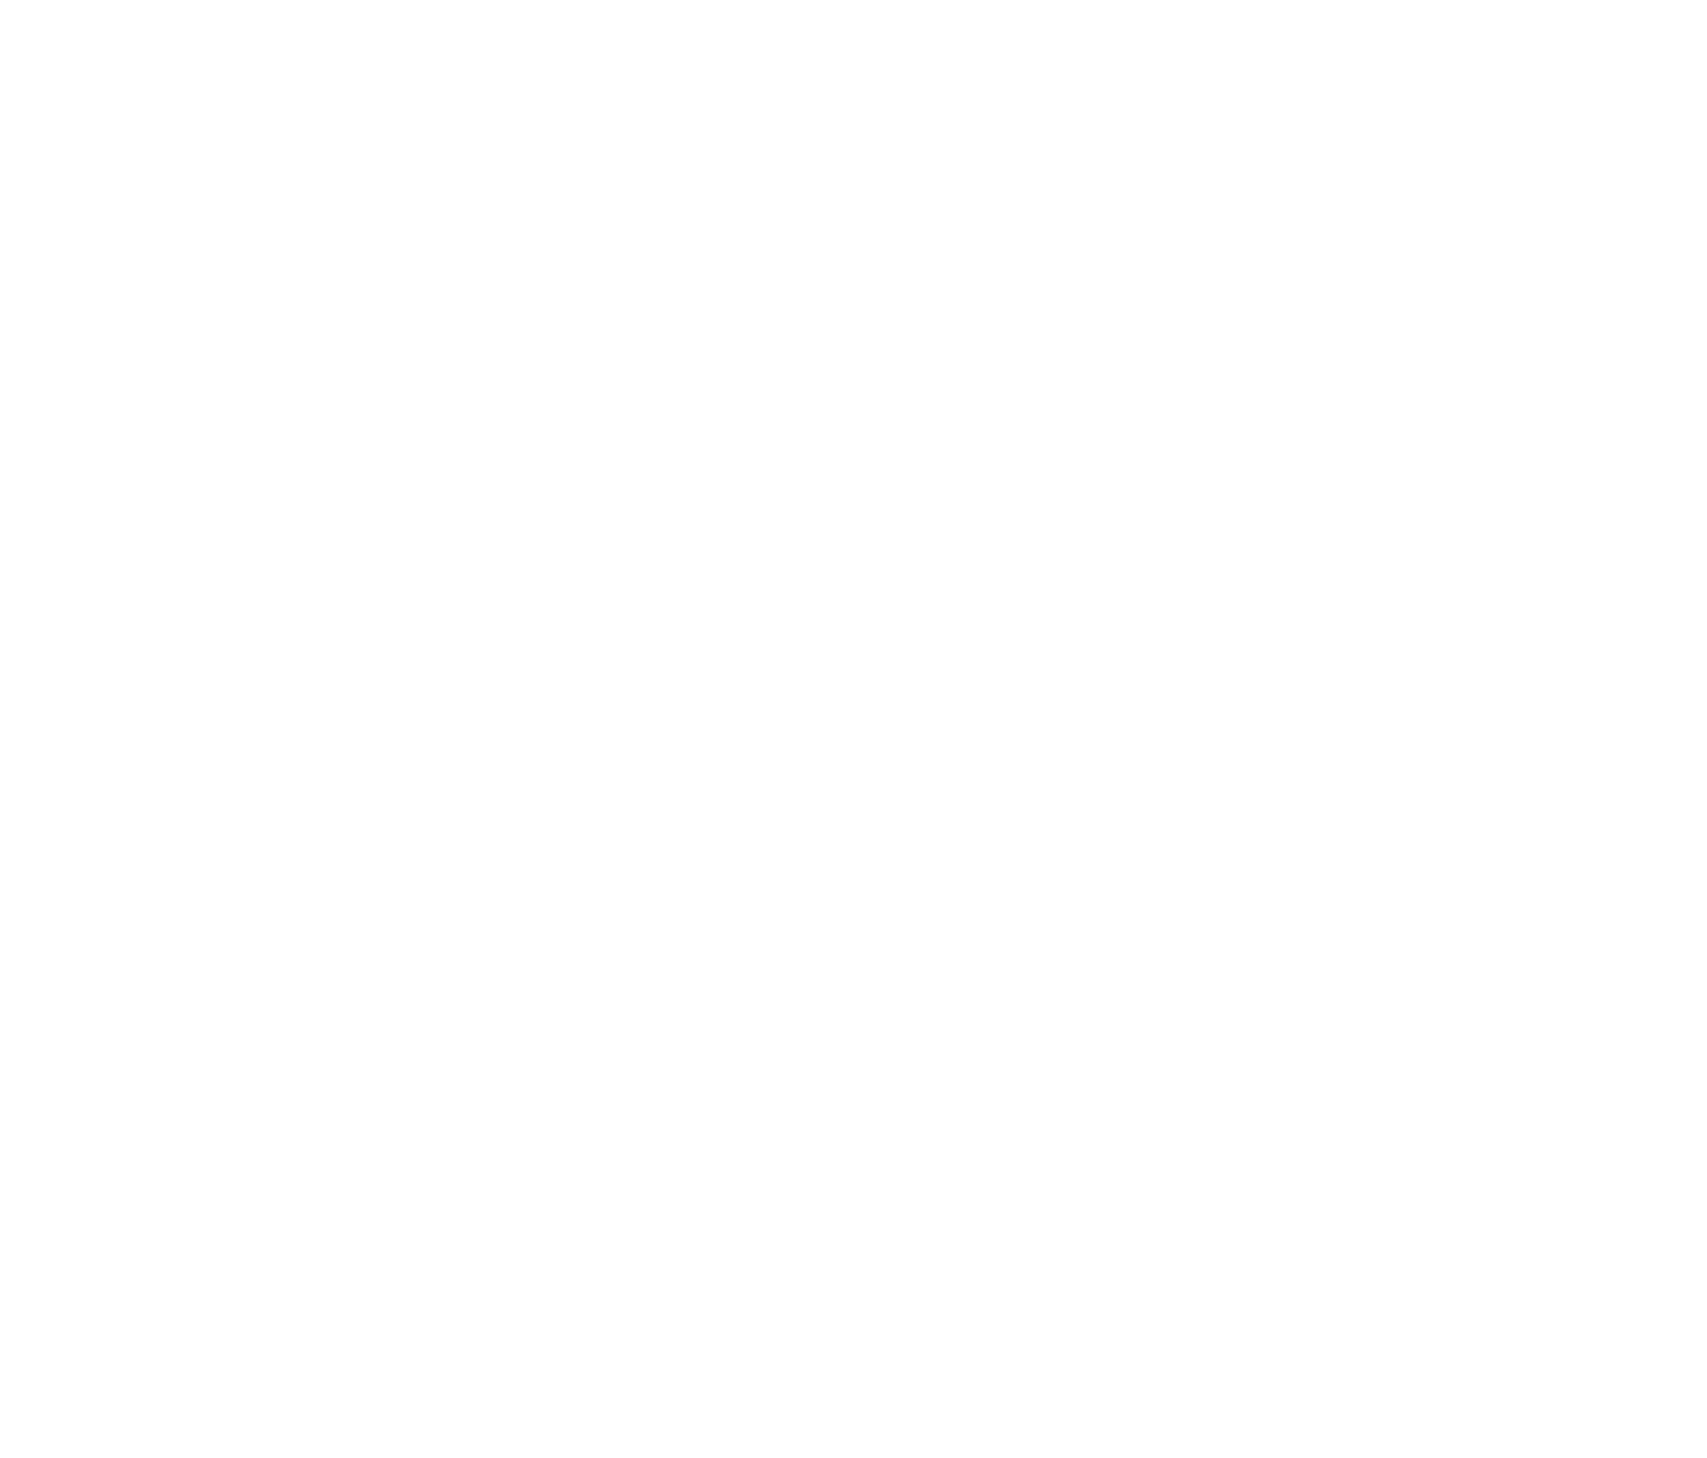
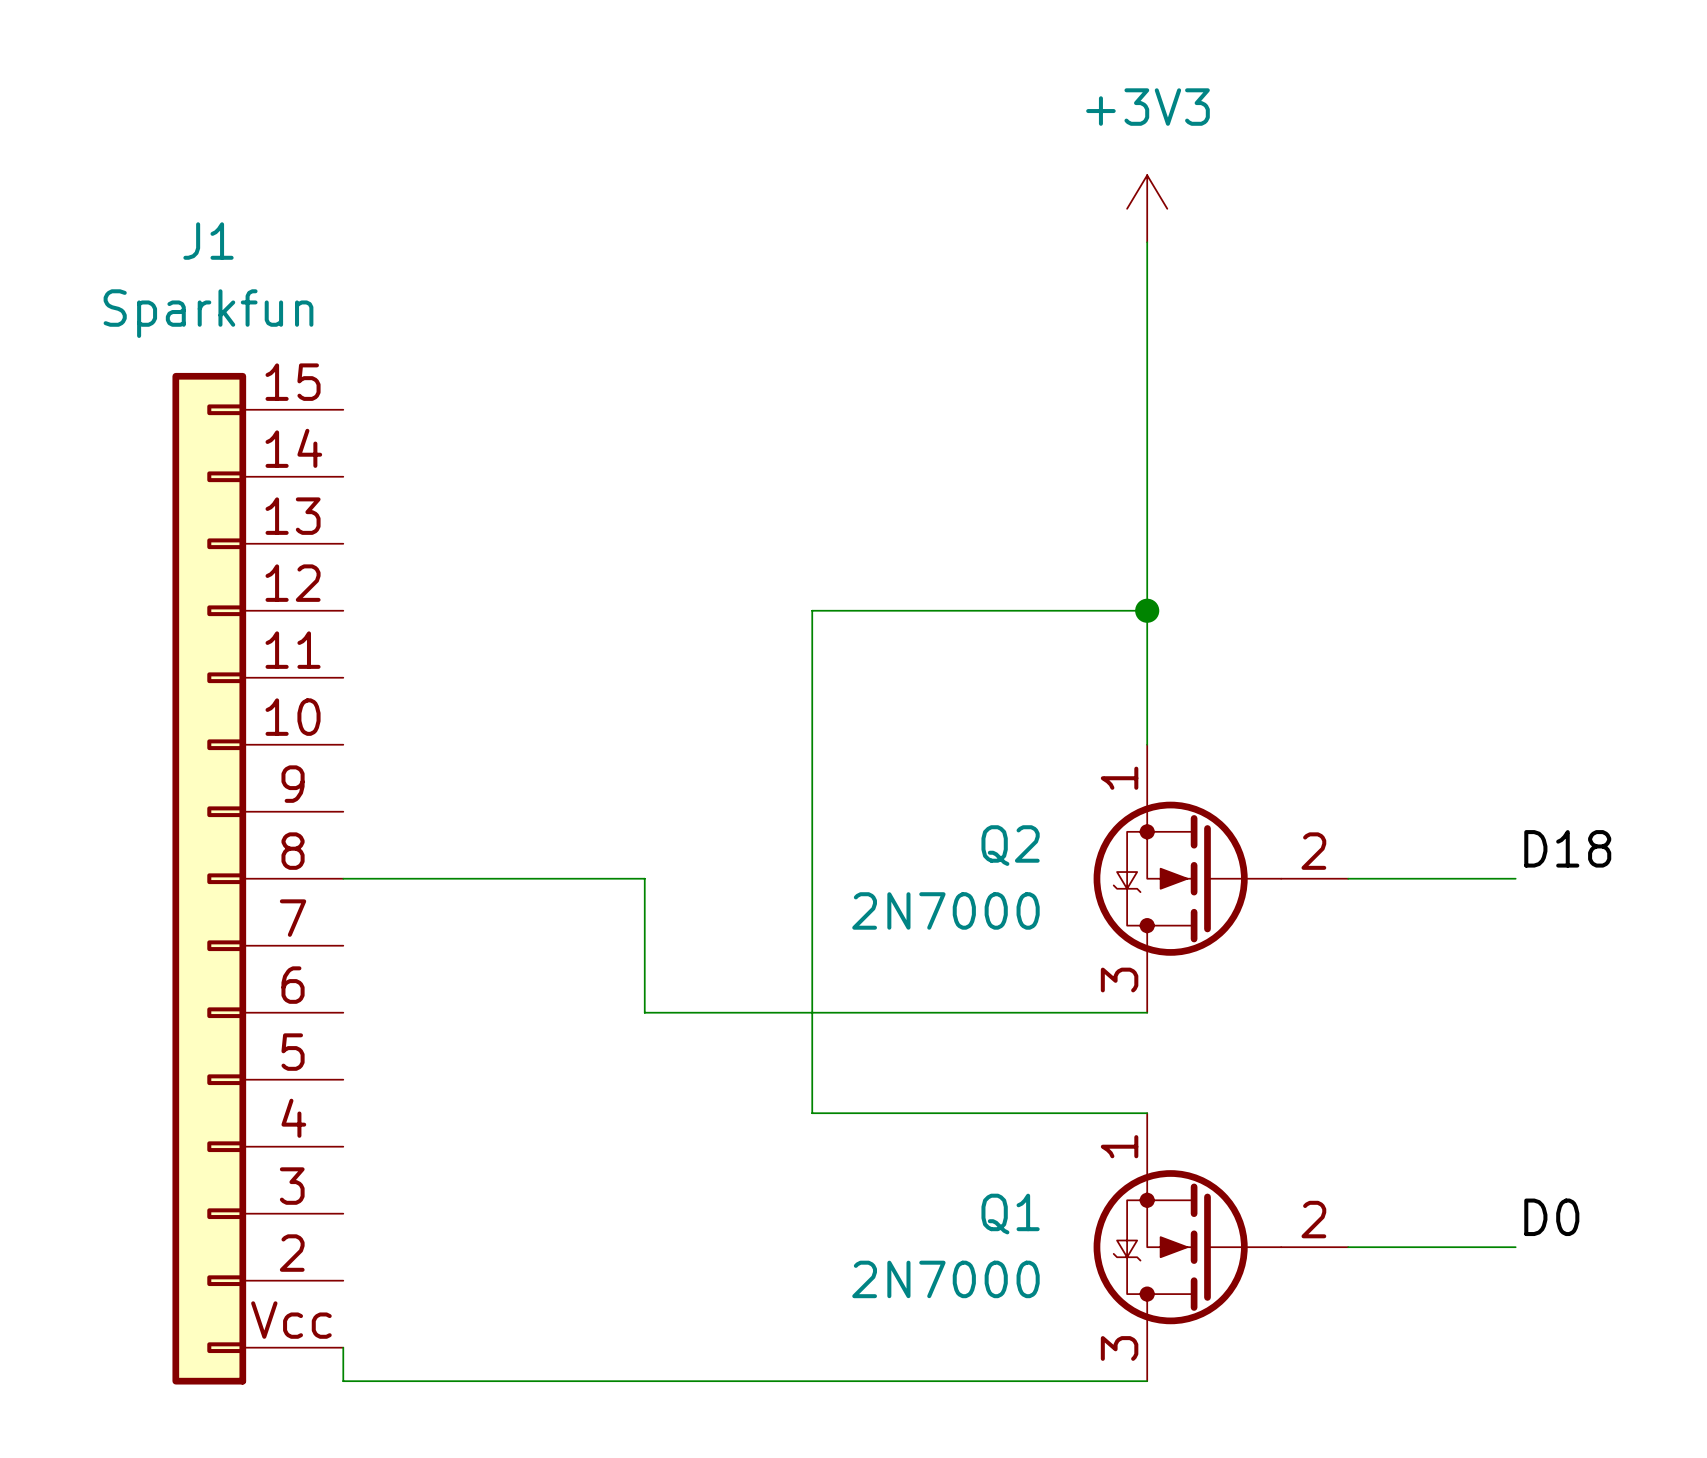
power symbol: none -> +3V3 (1147, 208)
wire: none -> (1147, 242) (1147, 744)
wire: none -> (1147, 610) (812, 610) (812, 1113) (1147, 1113)
junction: none -> (1147, 610)
label: none -> D18 (1567, 848)
J1: none -> Sparkfun (257, 878)
wire: none -> (343, 878) (644, 878) (644, 1012) (1147, 1012)
Q2: none -> 2N7000 (1220, 878)
wire: none -> (1348, 878) (1515, 878)
label: none -> D0 (1551, 1217)
Q1: none -> 2N7000 (1220, 1247)
wire: none -> (1348, 1247) (1515, 1247)
wire: none -> (343, 1347) (343, 1381) (1147, 1381)

